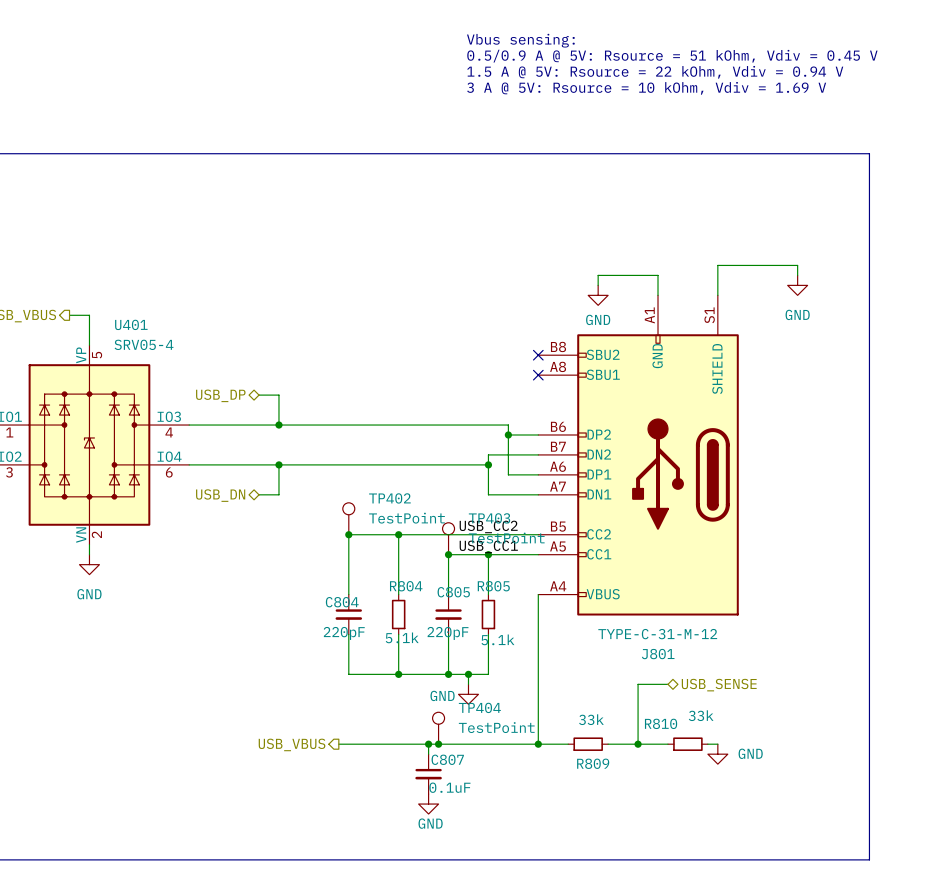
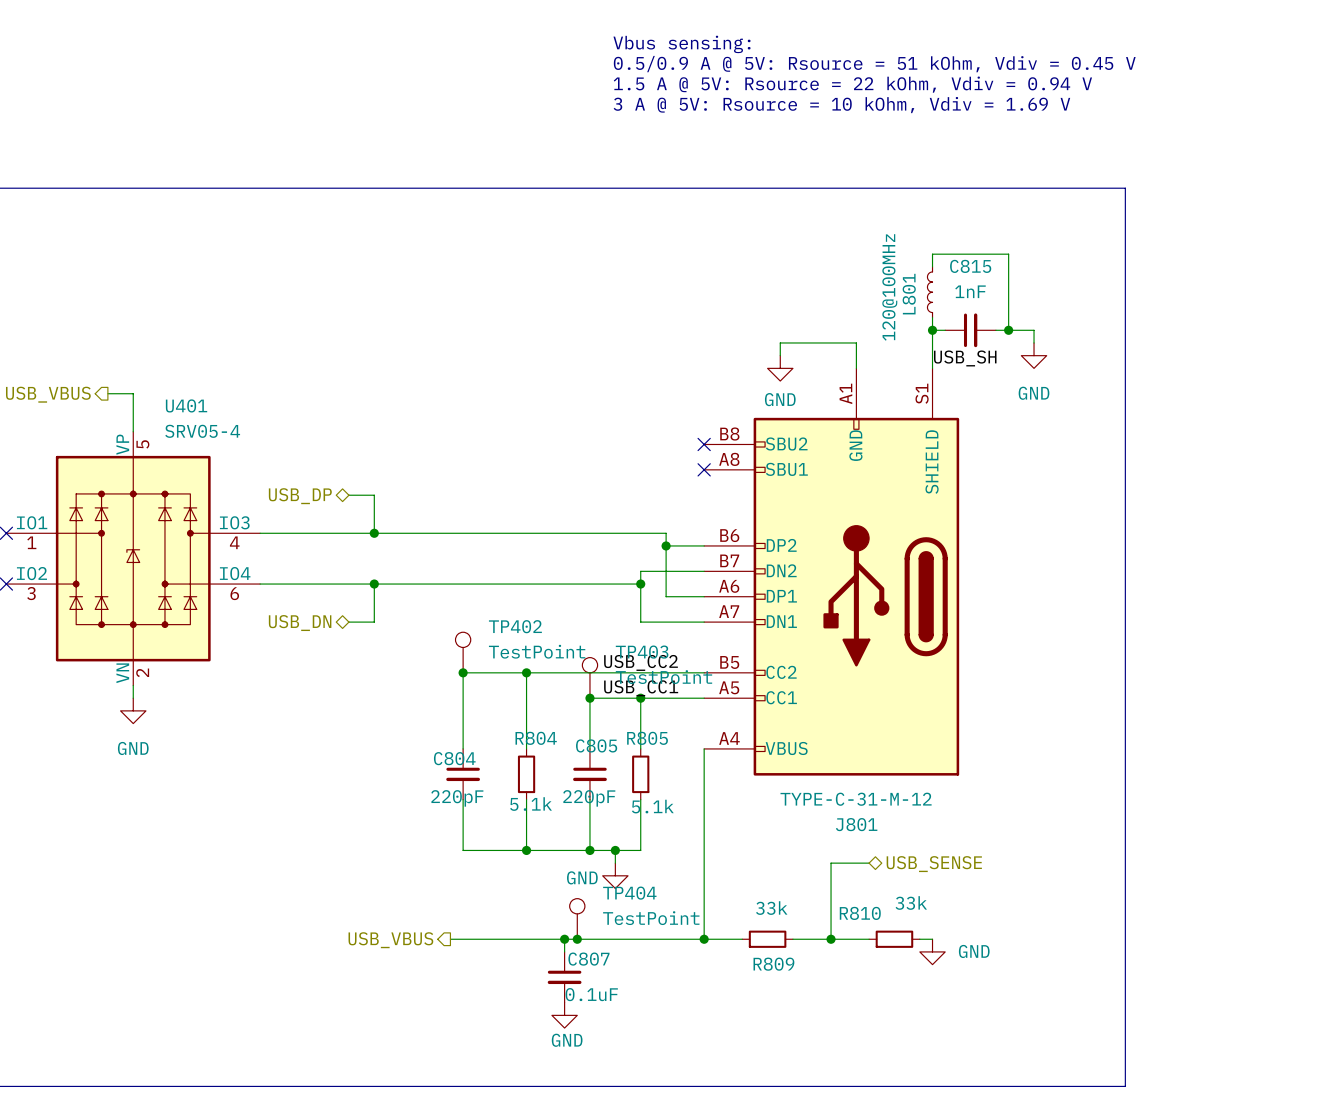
wire: none -> (932, 266) (932, 254) (1008, 254) (1008, 330)
L801: none -> 120@100MHz (929, 292)
wire: none -> (932, 317) (932, 330)
junction: none -> (932, 330)
C815: none -> 1nF (970, 330)
junction: none -> (1008, 330)
label: none -> USB_SH (965, 358)

